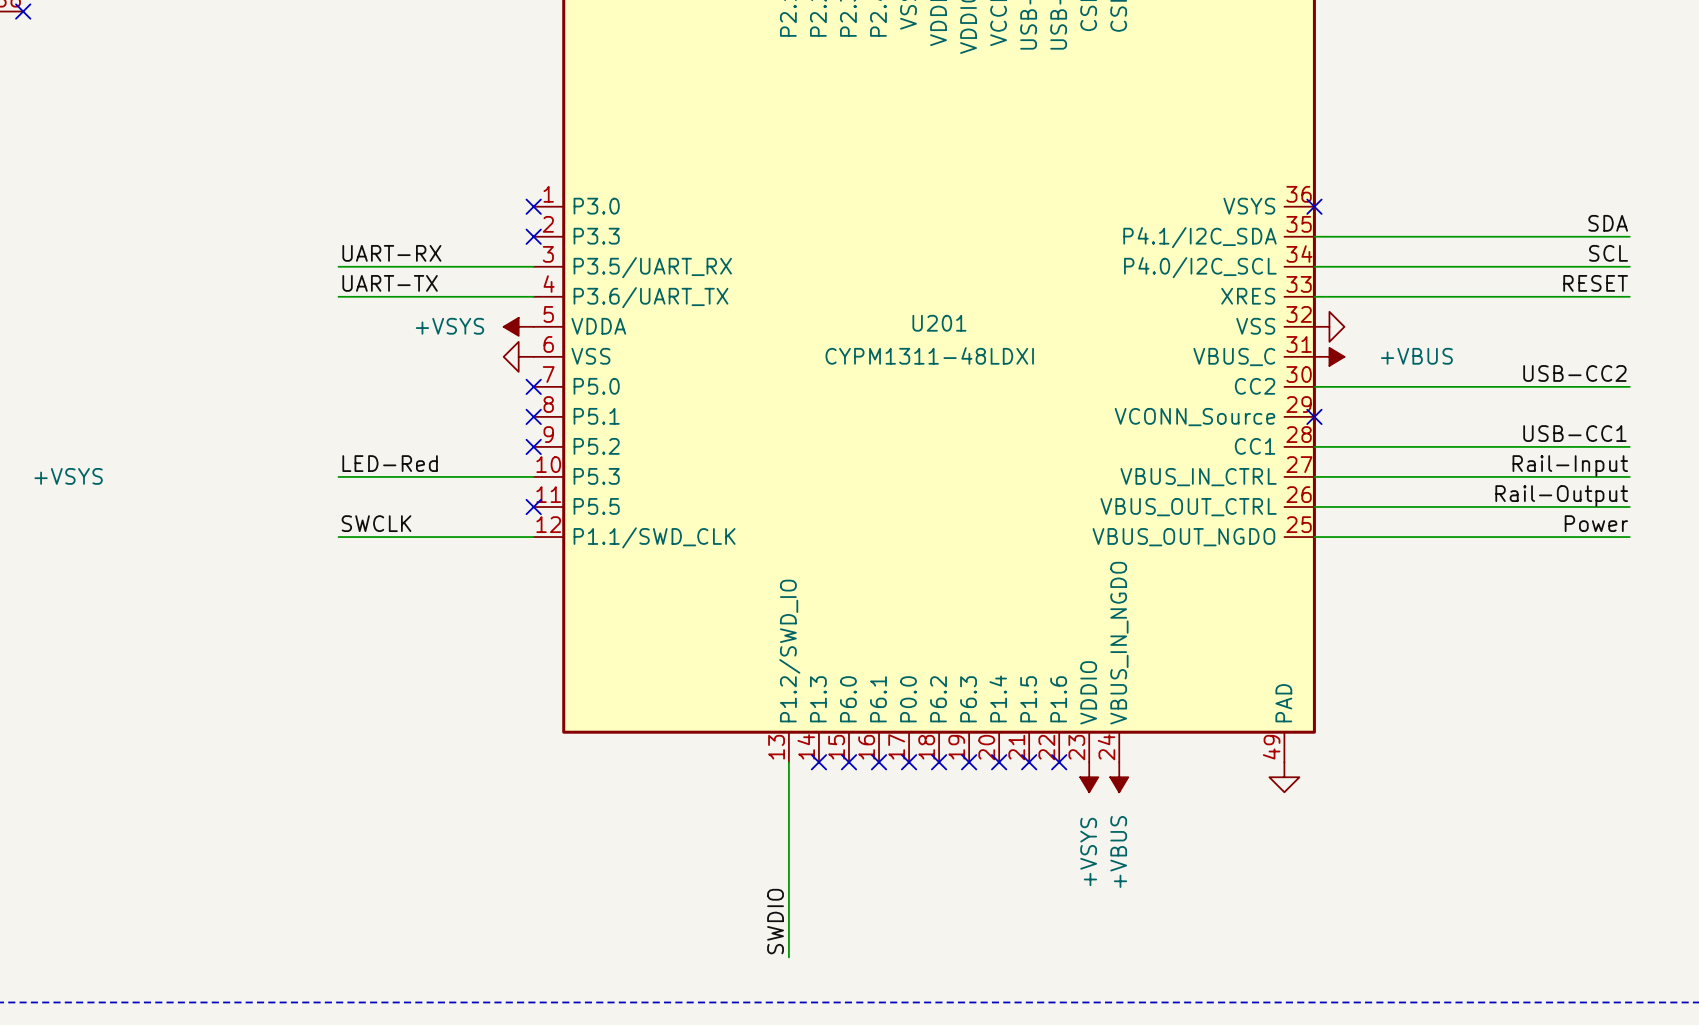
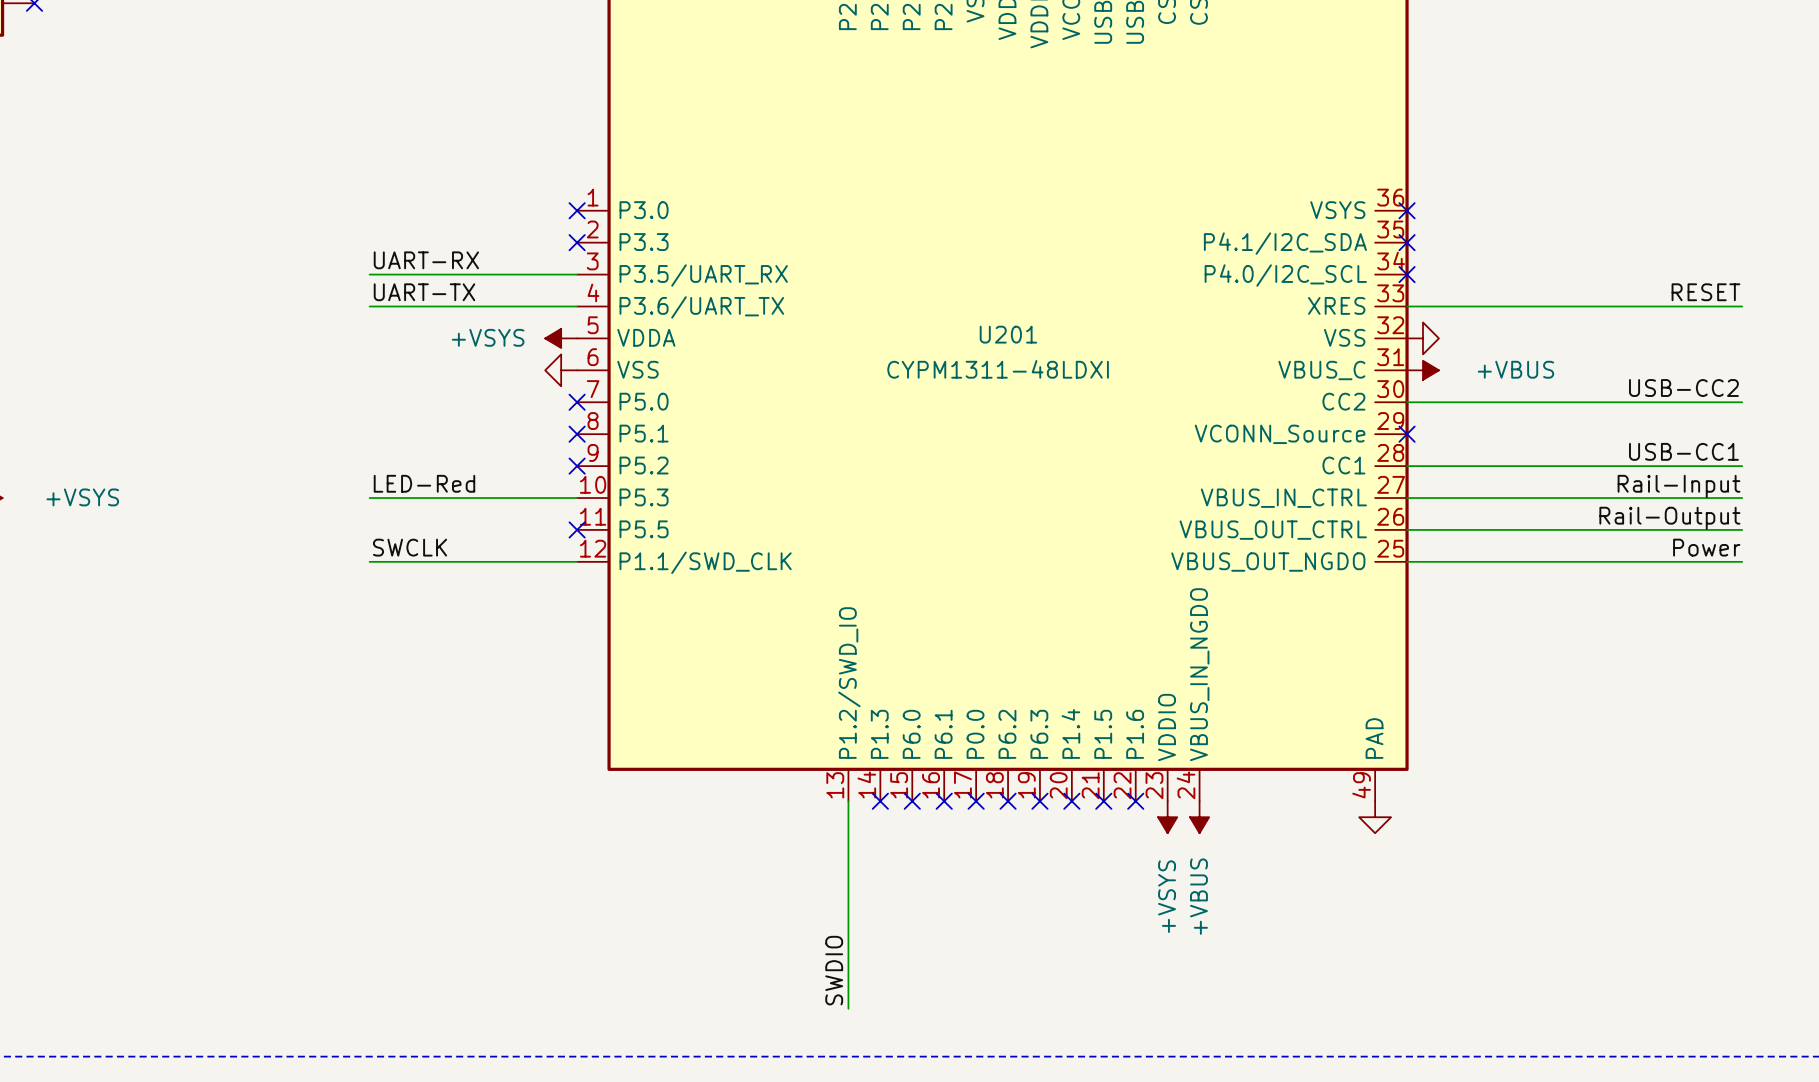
label: SDA (1608, 223) -> none
wire: (1314, 236) (1629, 236) -> none
no-connect mark: none -> (1407, 242)
label: SCL (1608, 253) -> none
wire: (1314, 266) (1629, 266) -> none
no-connect mark: none -> (1407, 274)

